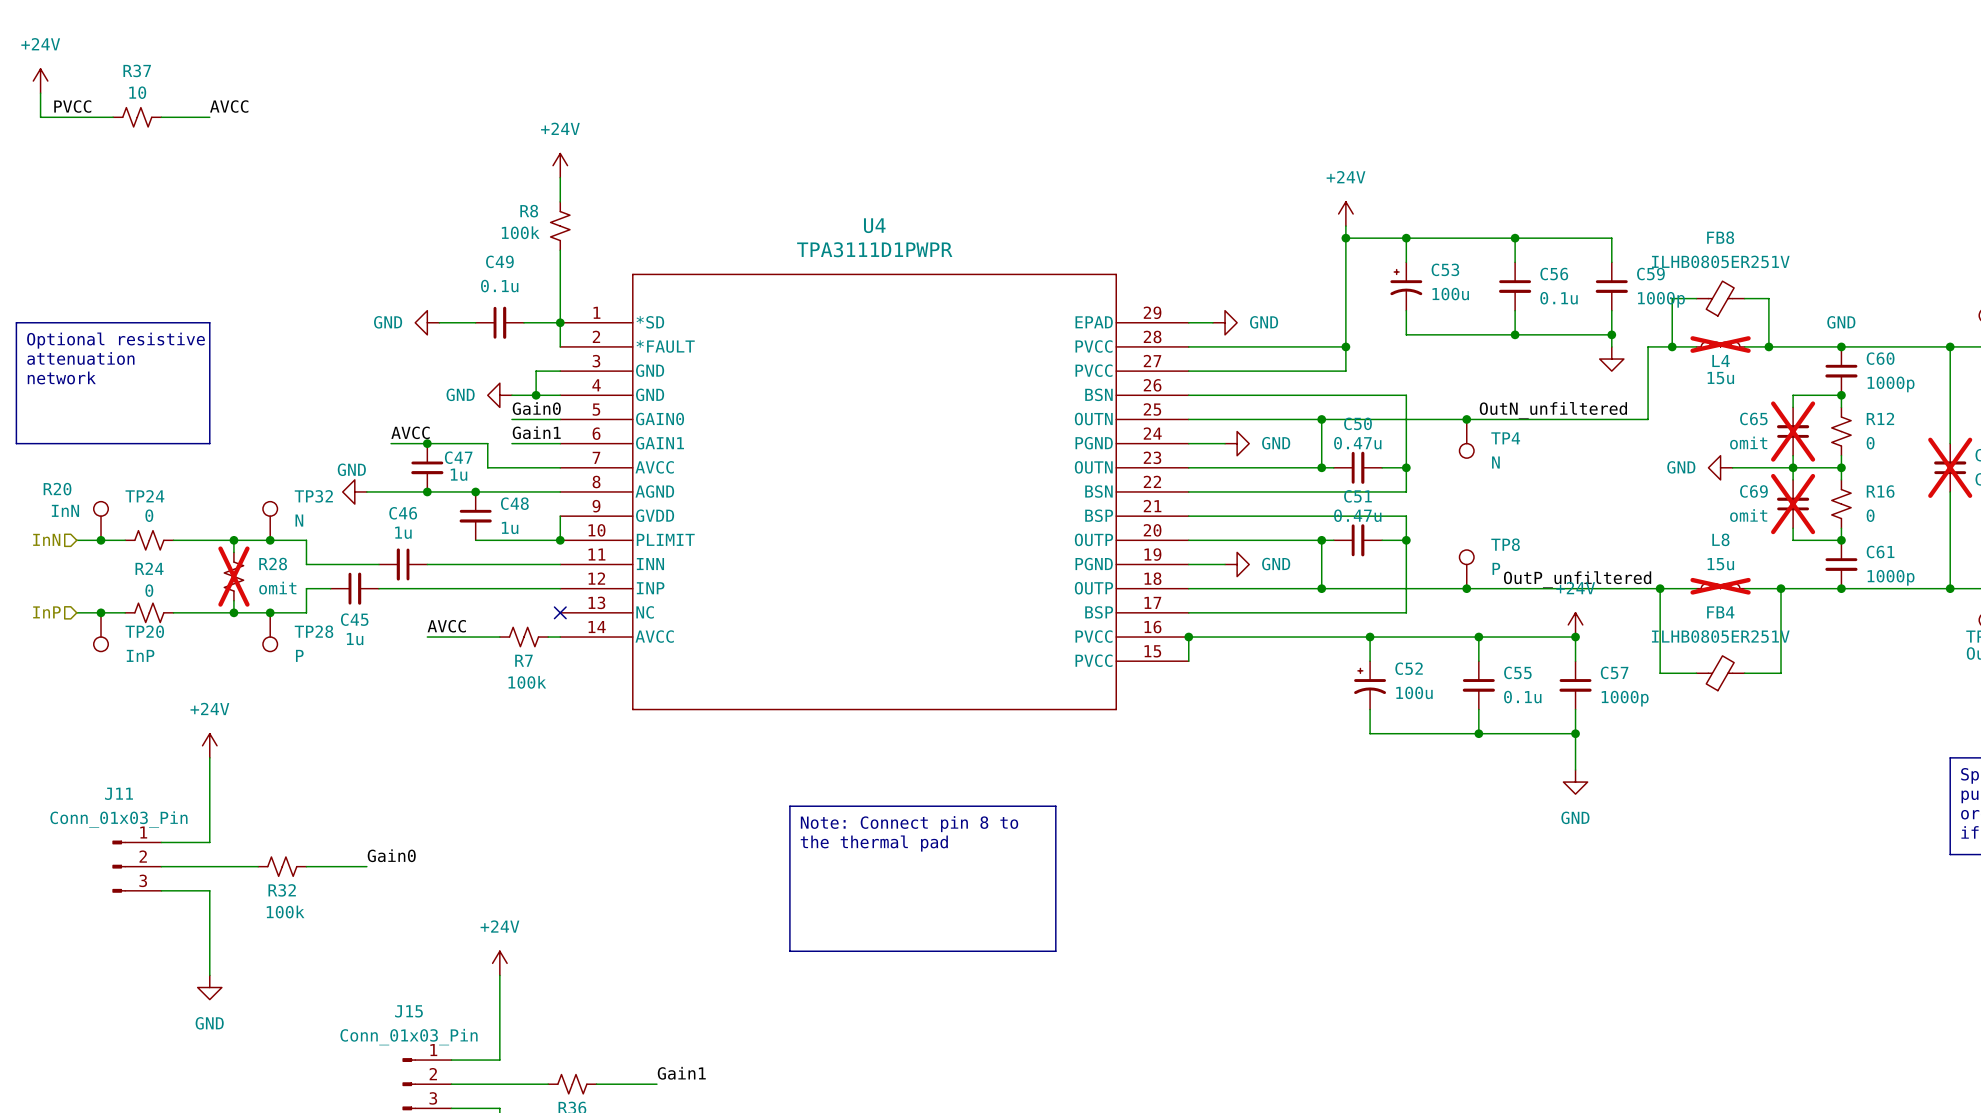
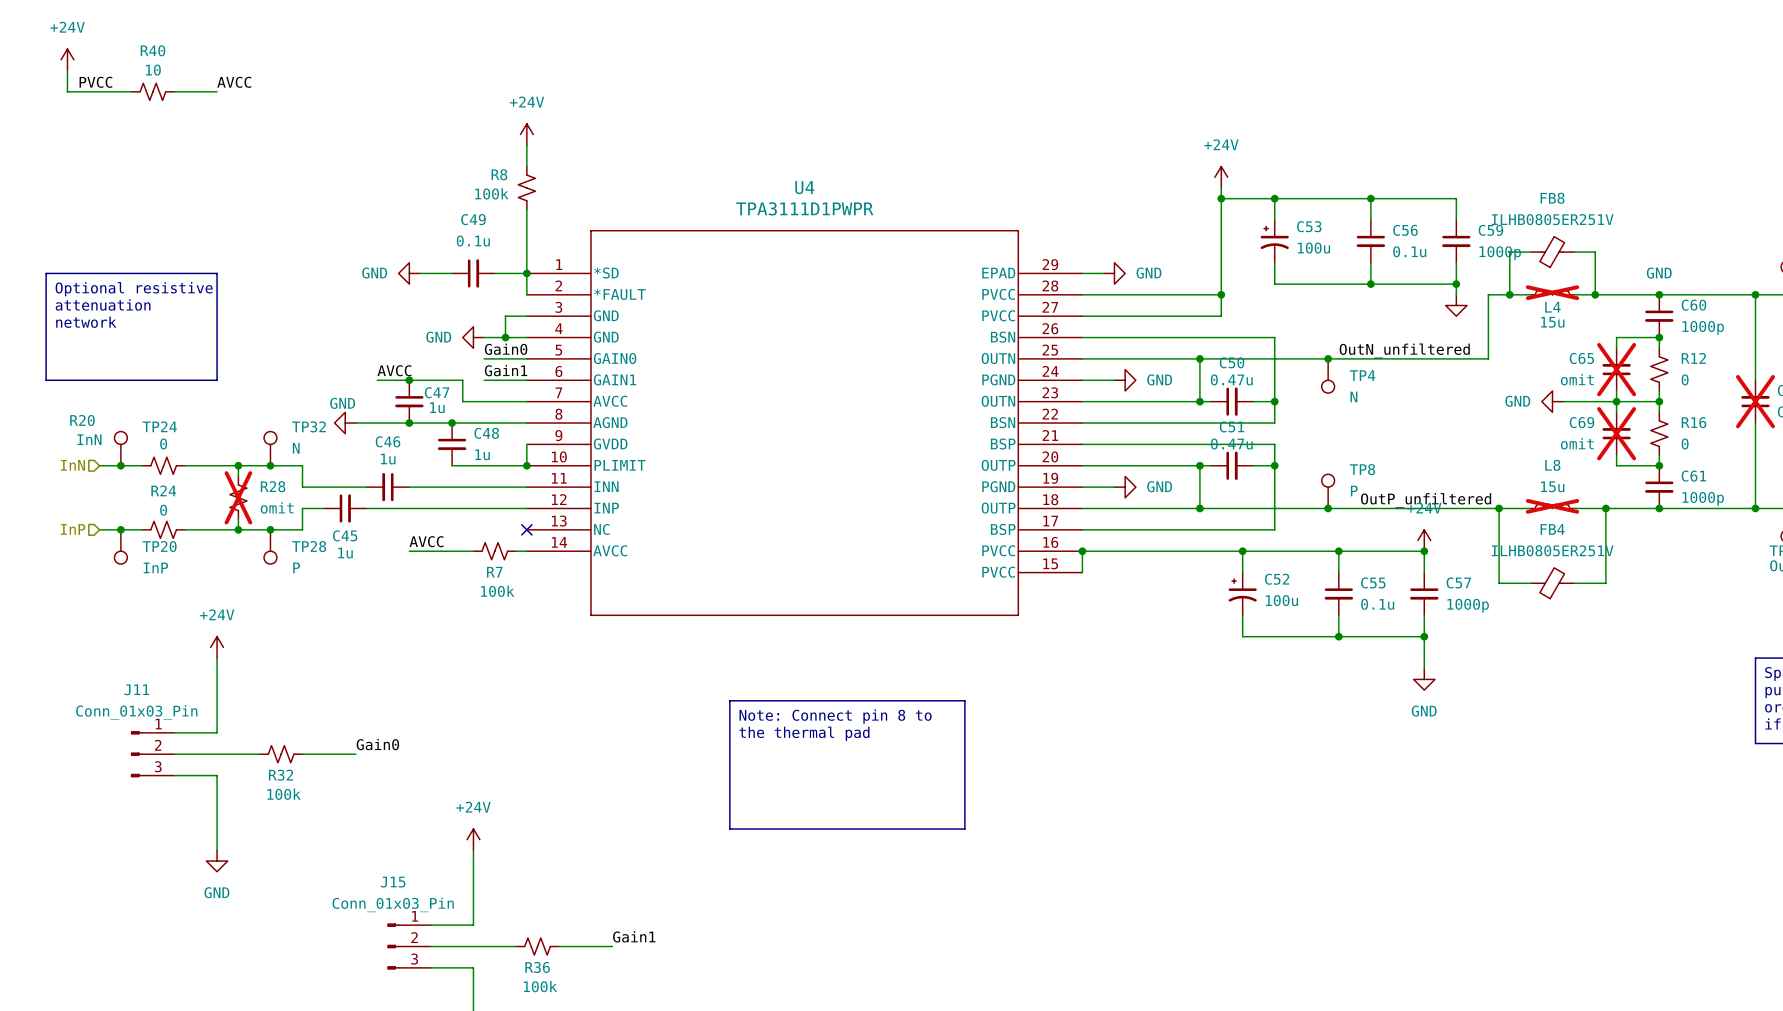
R37 name: R37 (137, 70) -> R40 (152, 50)

